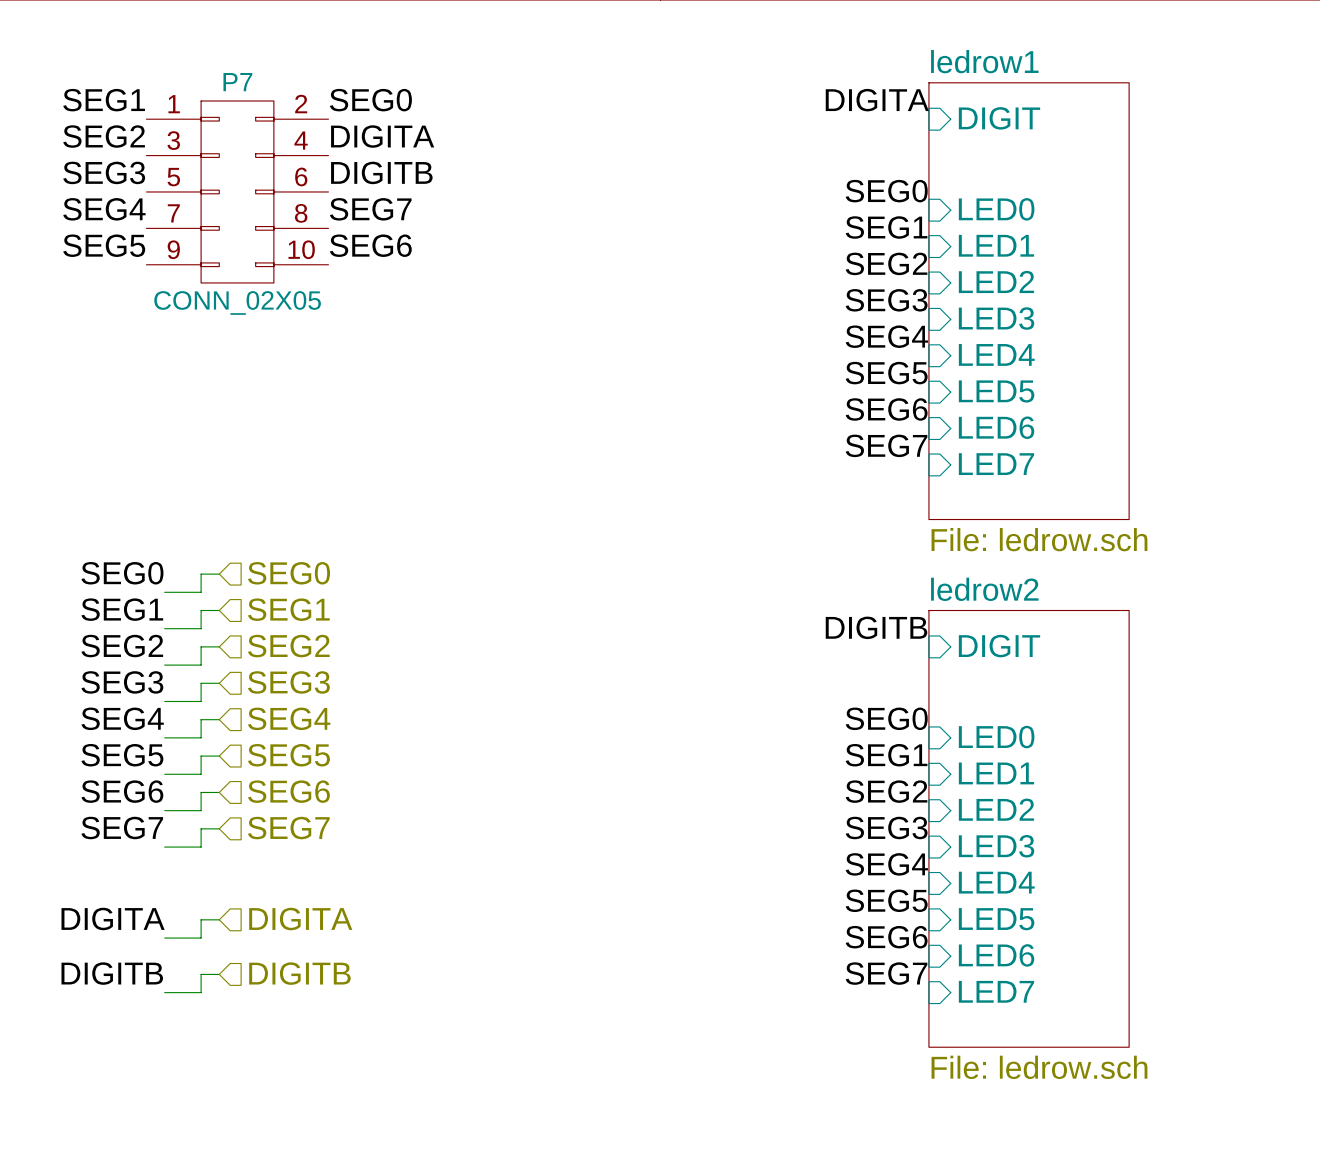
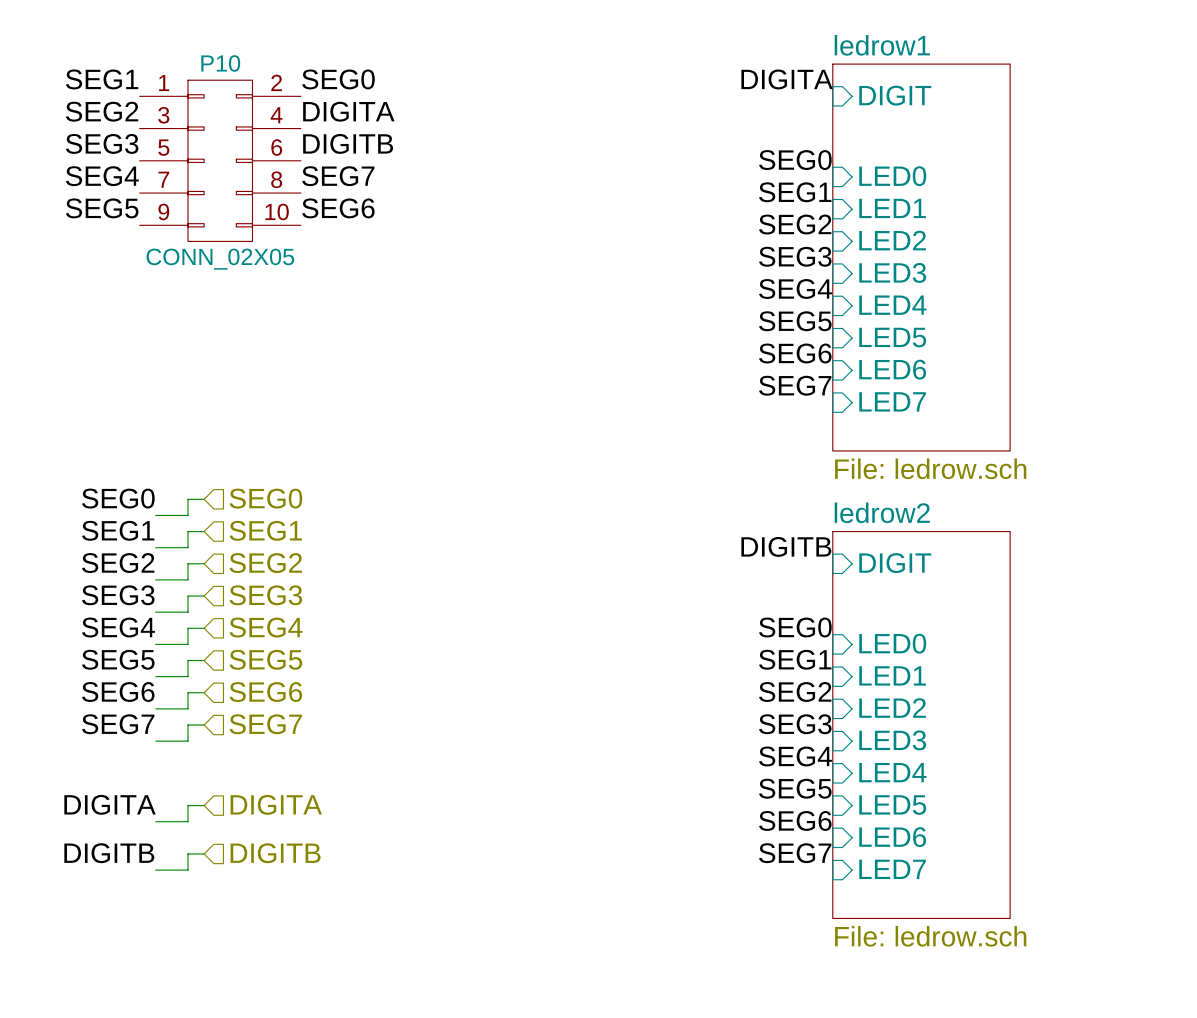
P7 name: P7 (237, 82) -> P10 (220, 63)

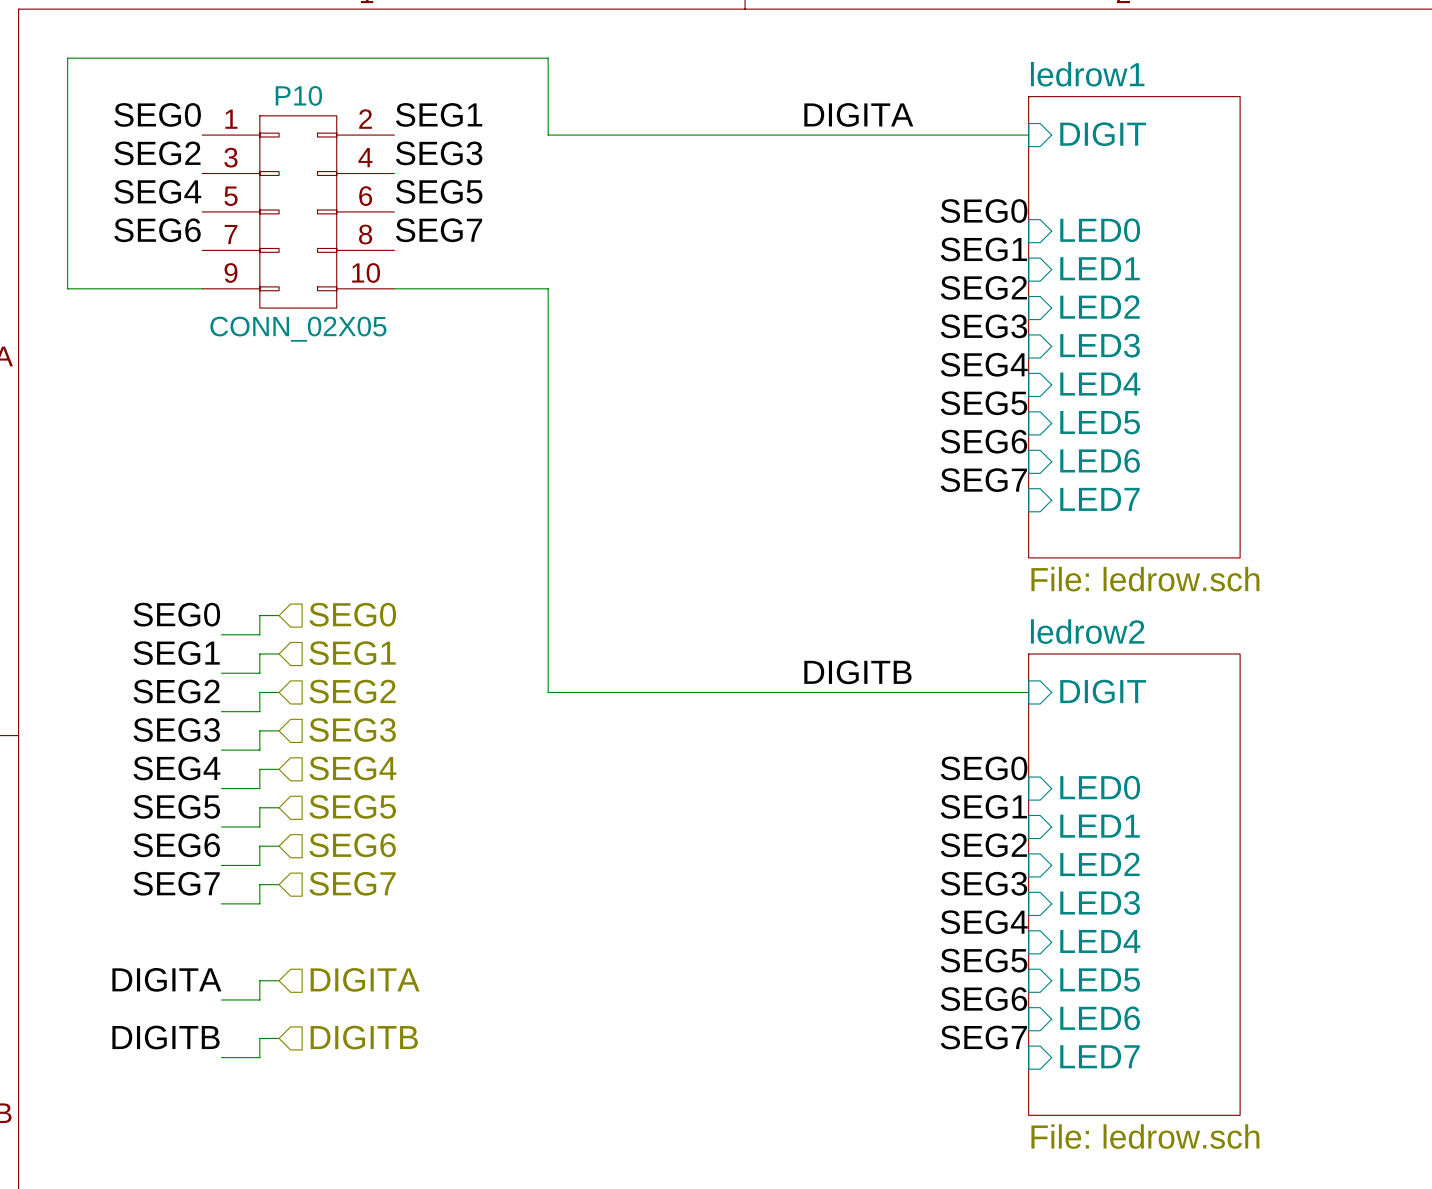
label: SEG1 (102, 79) -> SEG0 (157, 114)
label: SEG0 (338, 79) -> SEG1 (439, 114)
label position: DIGITA (787, 79) -> DIGITA (858, 114)
wire: none -> (1028, 135) (548, 135) (548, 58) (67, 58) (67, 288) (202, 288)
label: DIGITA (348, 111) -> SEG3 (439, 153)
label: SEG3 (102, 143) -> SEG4 (157, 191)
label: DIGITB (348, 143) -> SEG5 (439, 191)
label: SEG4 (102, 176) -> SEG6 (157, 230)
label: SEG5 (102, 208) -> none
label: SEG6 (338, 208) -> none
wire: none -> (394, 288) (548, 288) (548, 692) (1028, 692)
label position: DIGITB (786, 546) -> DIGITB (857, 672)

